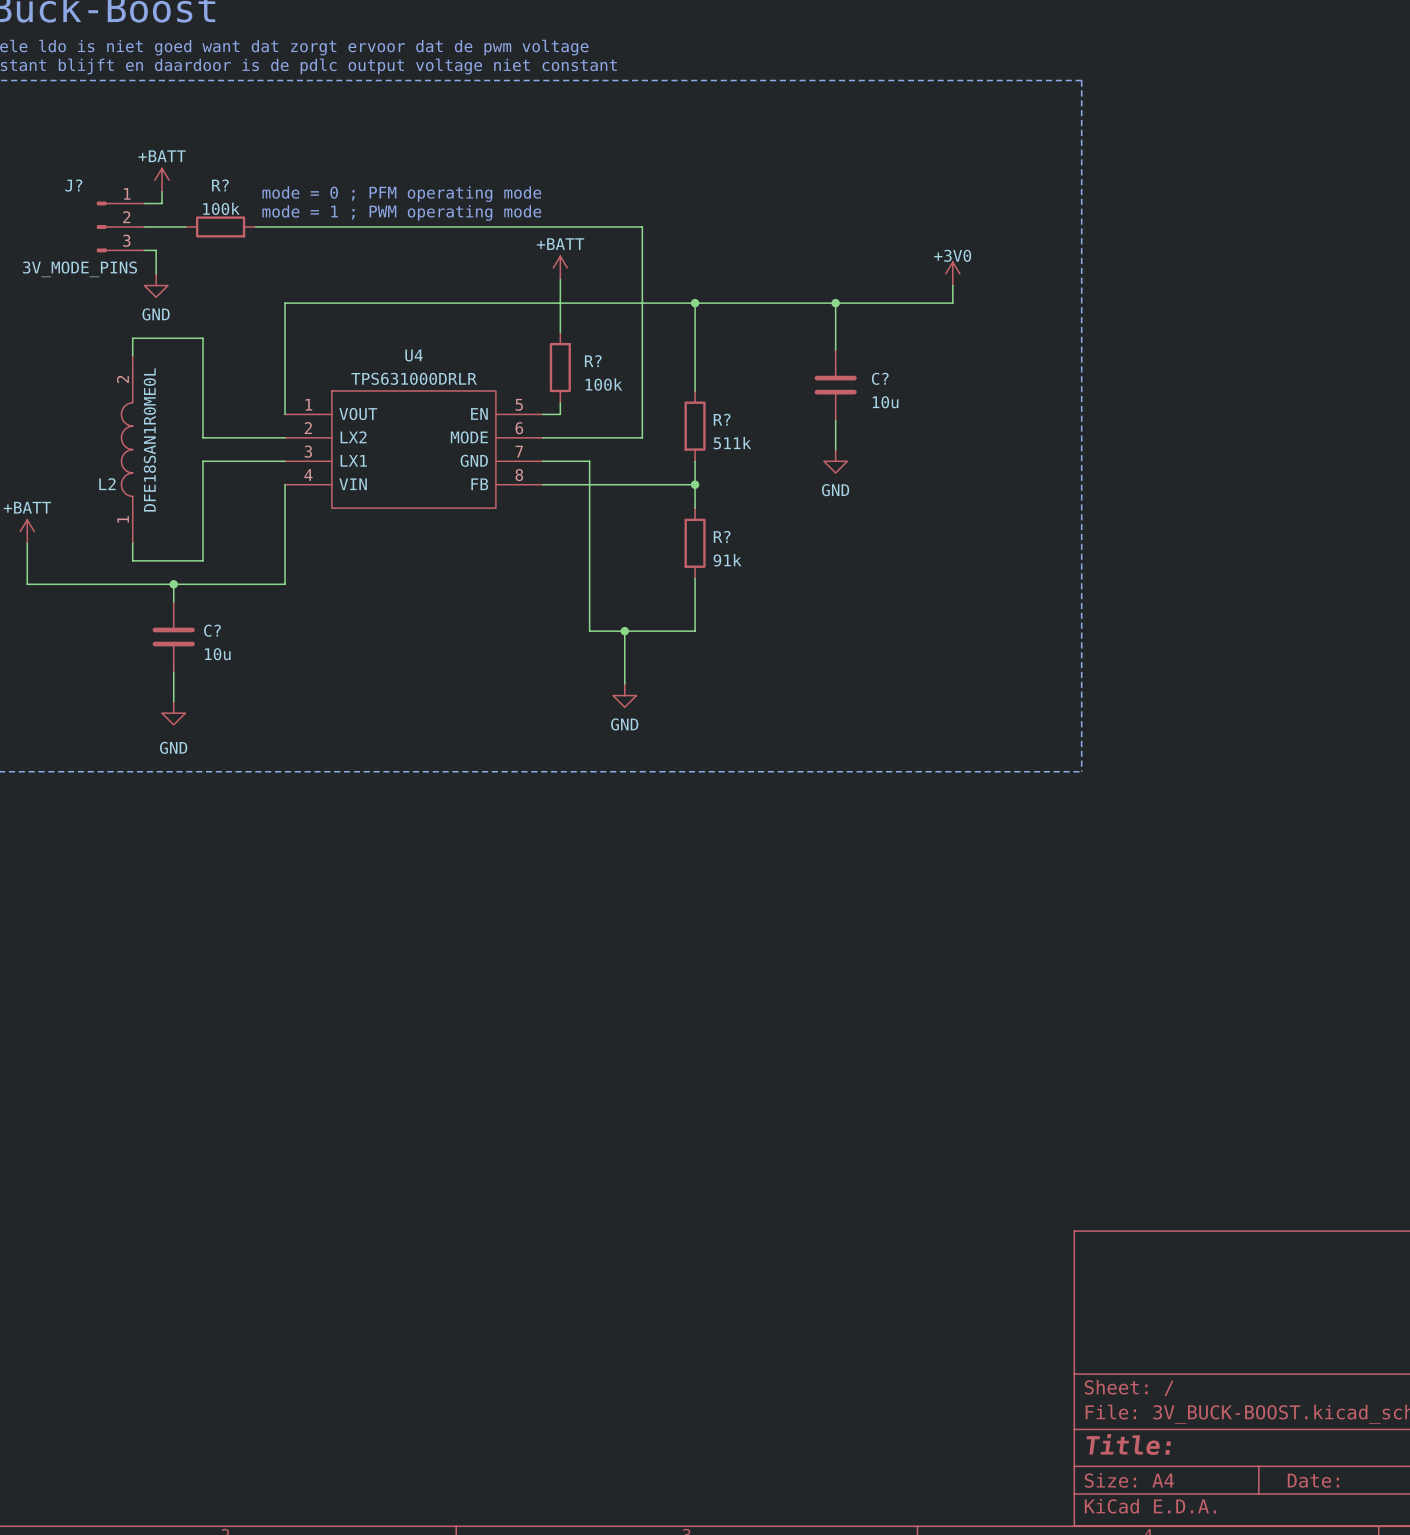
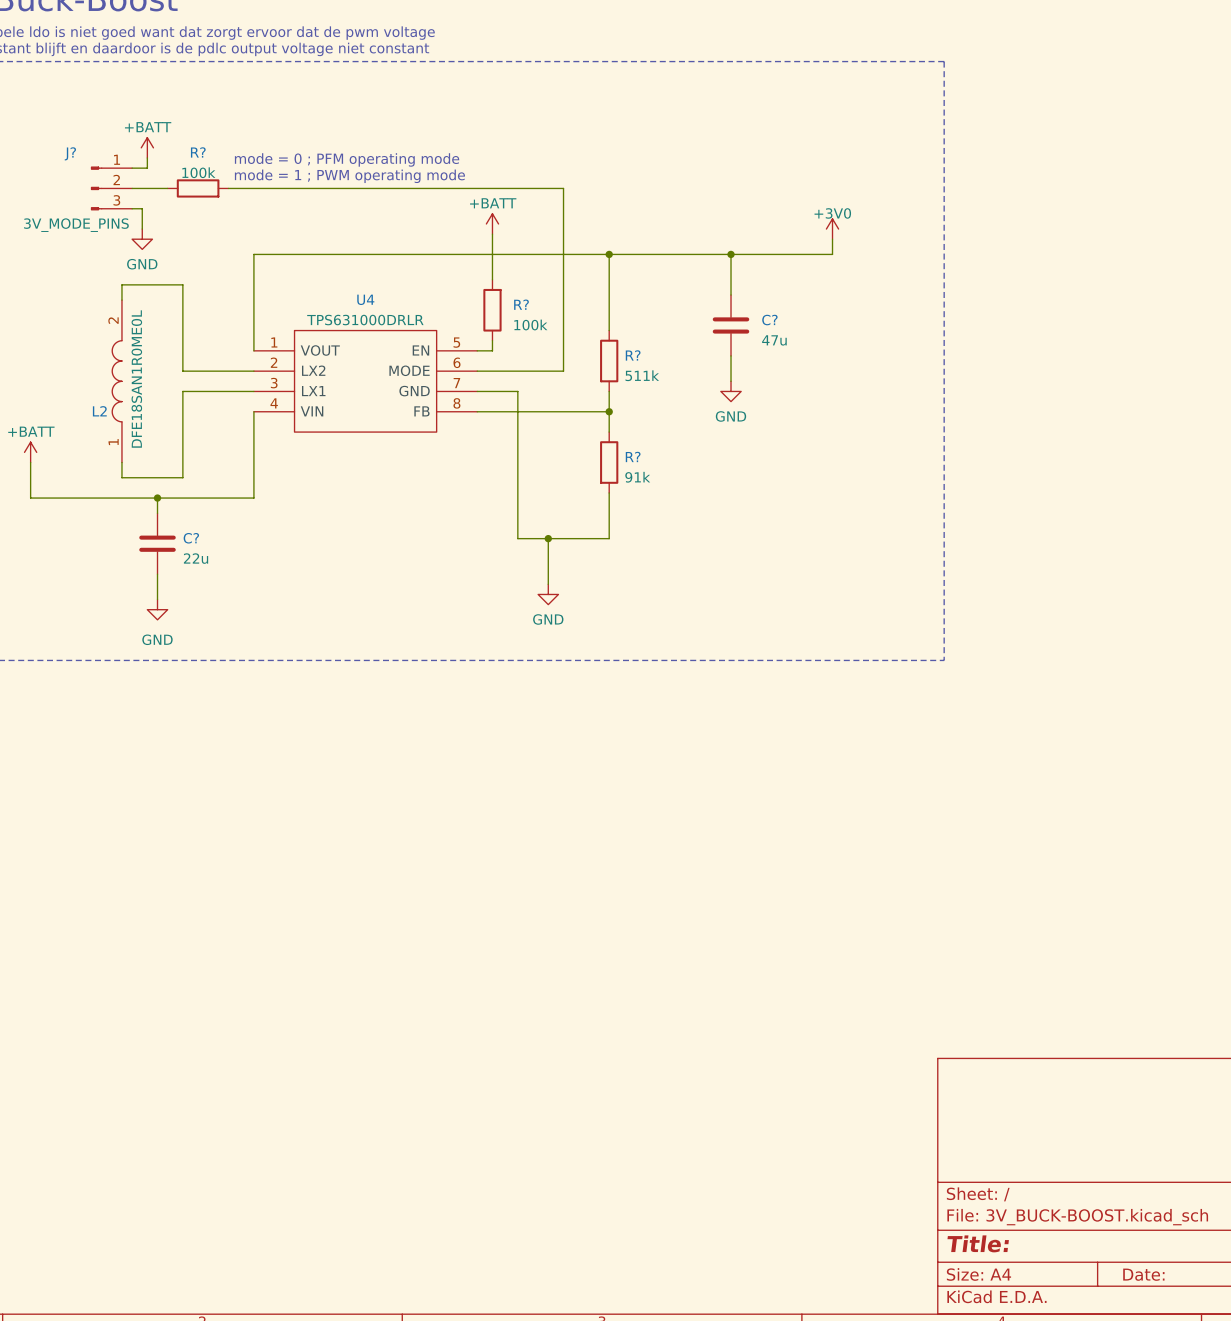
C? value: 10u (885, 402) -> 47u (774, 340)
C? value: 10u (217, 654) -> 22u (196, 558)

